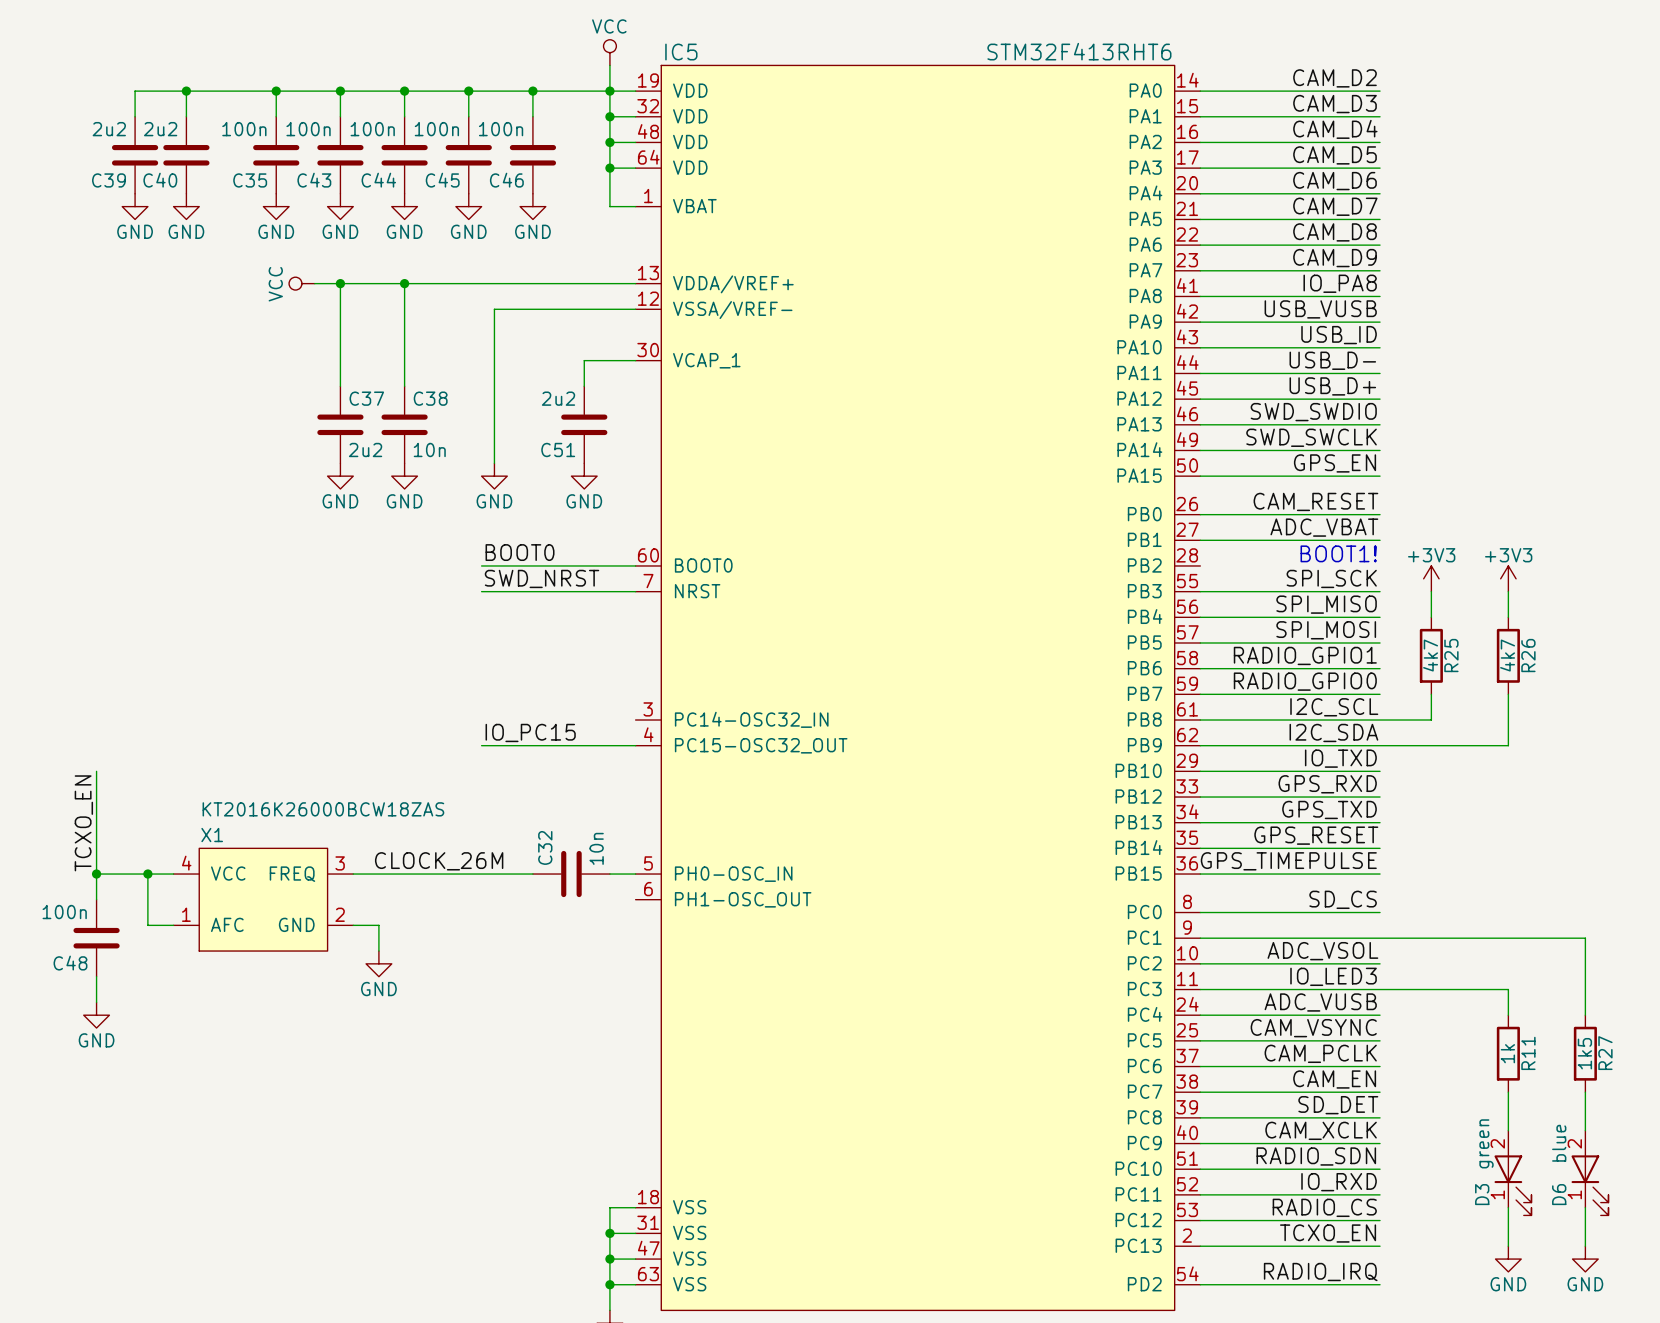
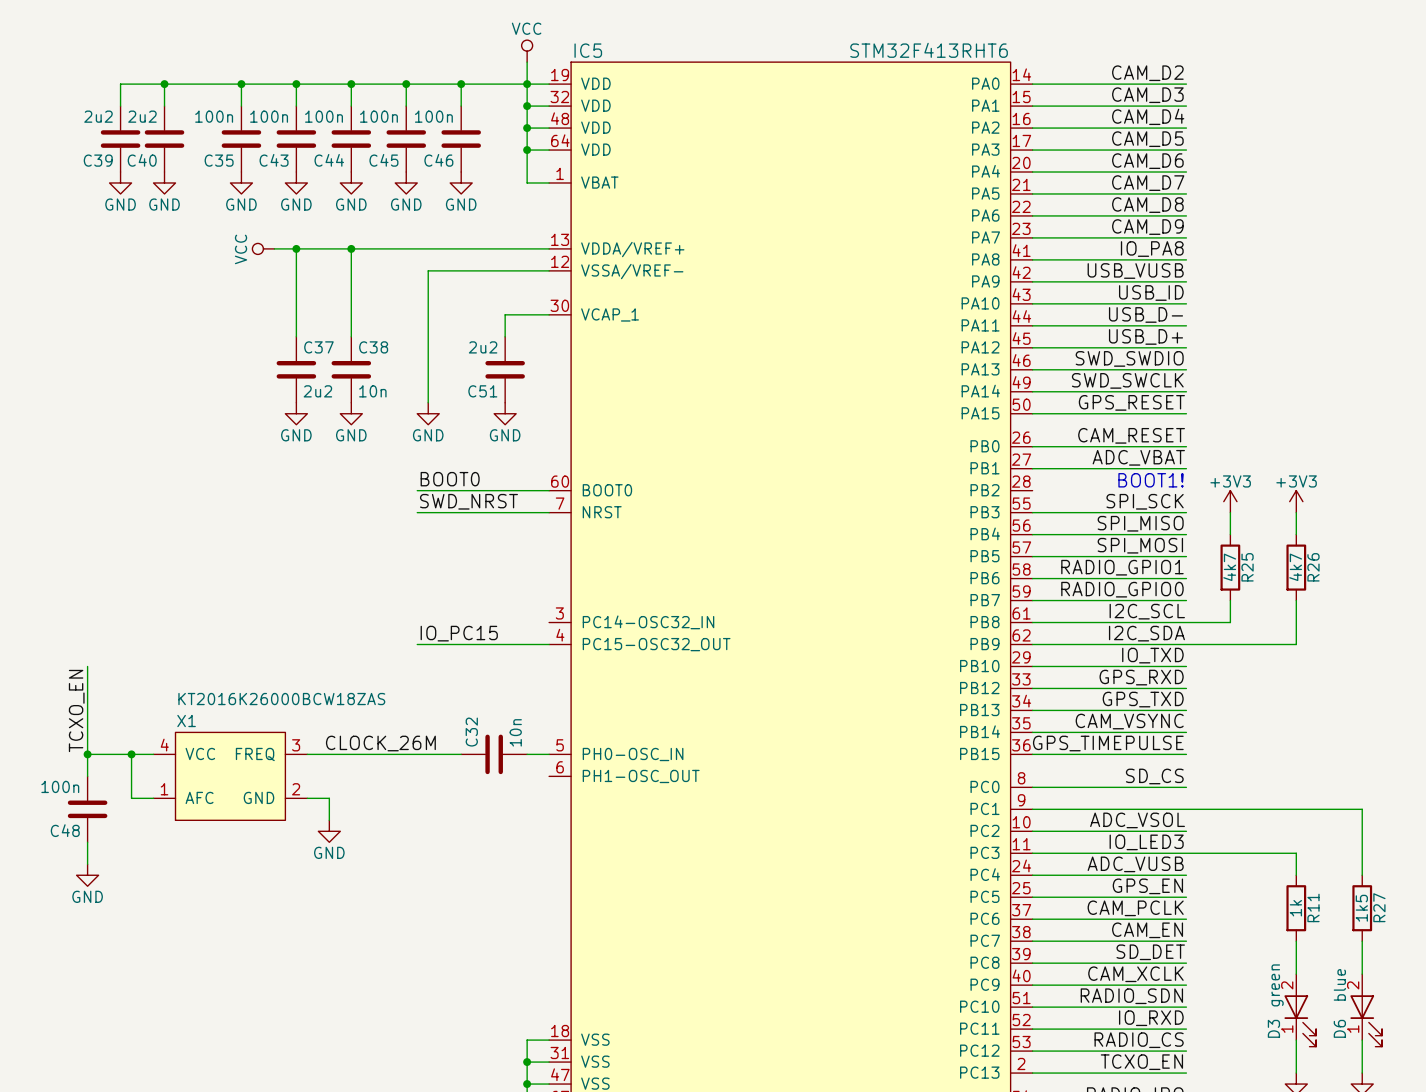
label: GPS_EN (1335, 463) -> GPS_RESET (1131, 402)
label: GPS_RESET (1316, 835) -> CAM_VSYNC (1129, 721)
label: CAM_VSYNC (1313, 1028) -> GPS_EN (1147, 886)

